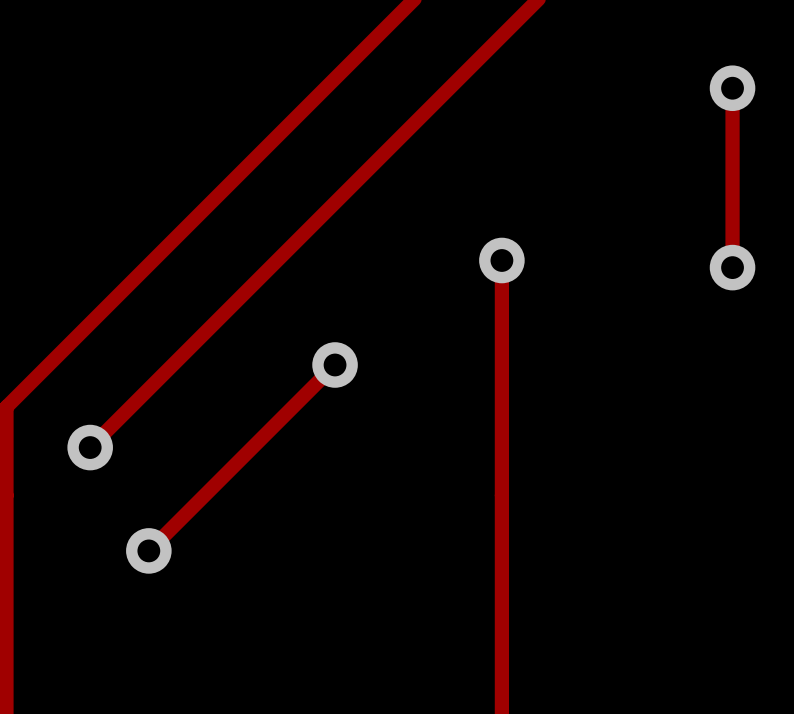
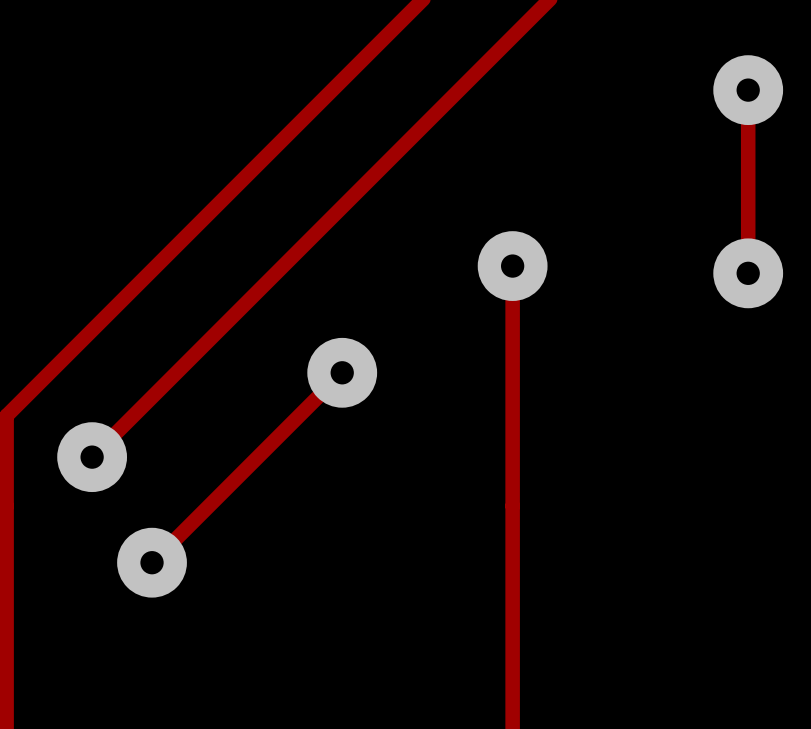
via size: [709, 65, 756, 112] -> [713, 55, 784, 126]
via size: [479, 237, 525, 284] -> [477, 231, 548, 301]
via size: [709, 244, 756, 291] -> [713, 238, 784, 309]
via size: [312, 342, 358, 388] -> [307, 337, 378, 408]
via size: [67, 424, 113, 471] -> [57, 422, 128, 493]
via size: [126, 528, 172, 574] -> [117, 527, 187, 598]

